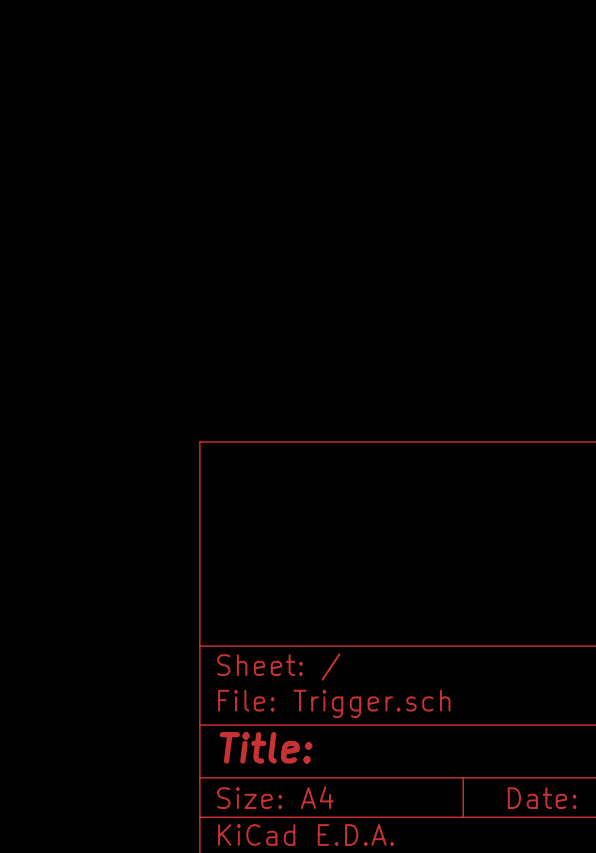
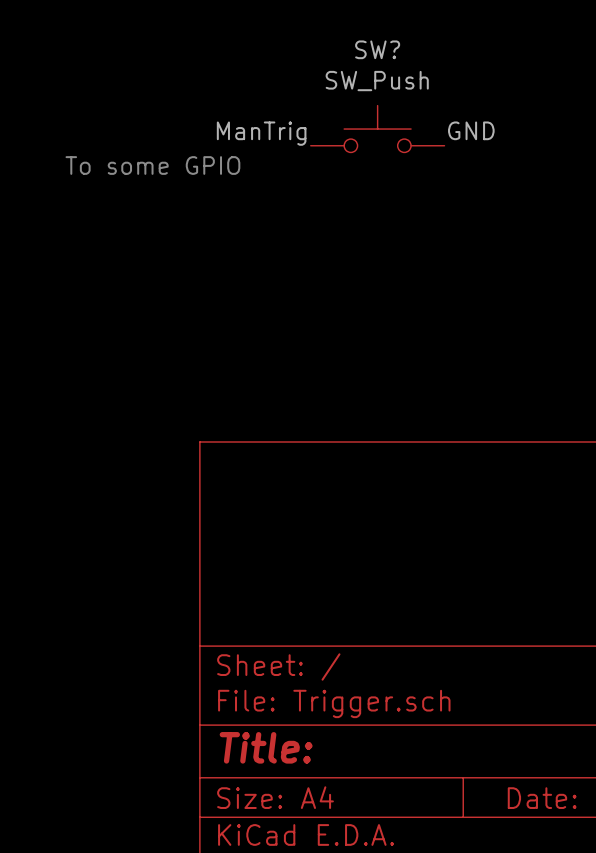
SW?: none -> SW_Push (377, 129)
label: none -> GND (471, 130)
label: none -> ManTrig (261, 133)
text: none -> To some GPIO (152, 165)

